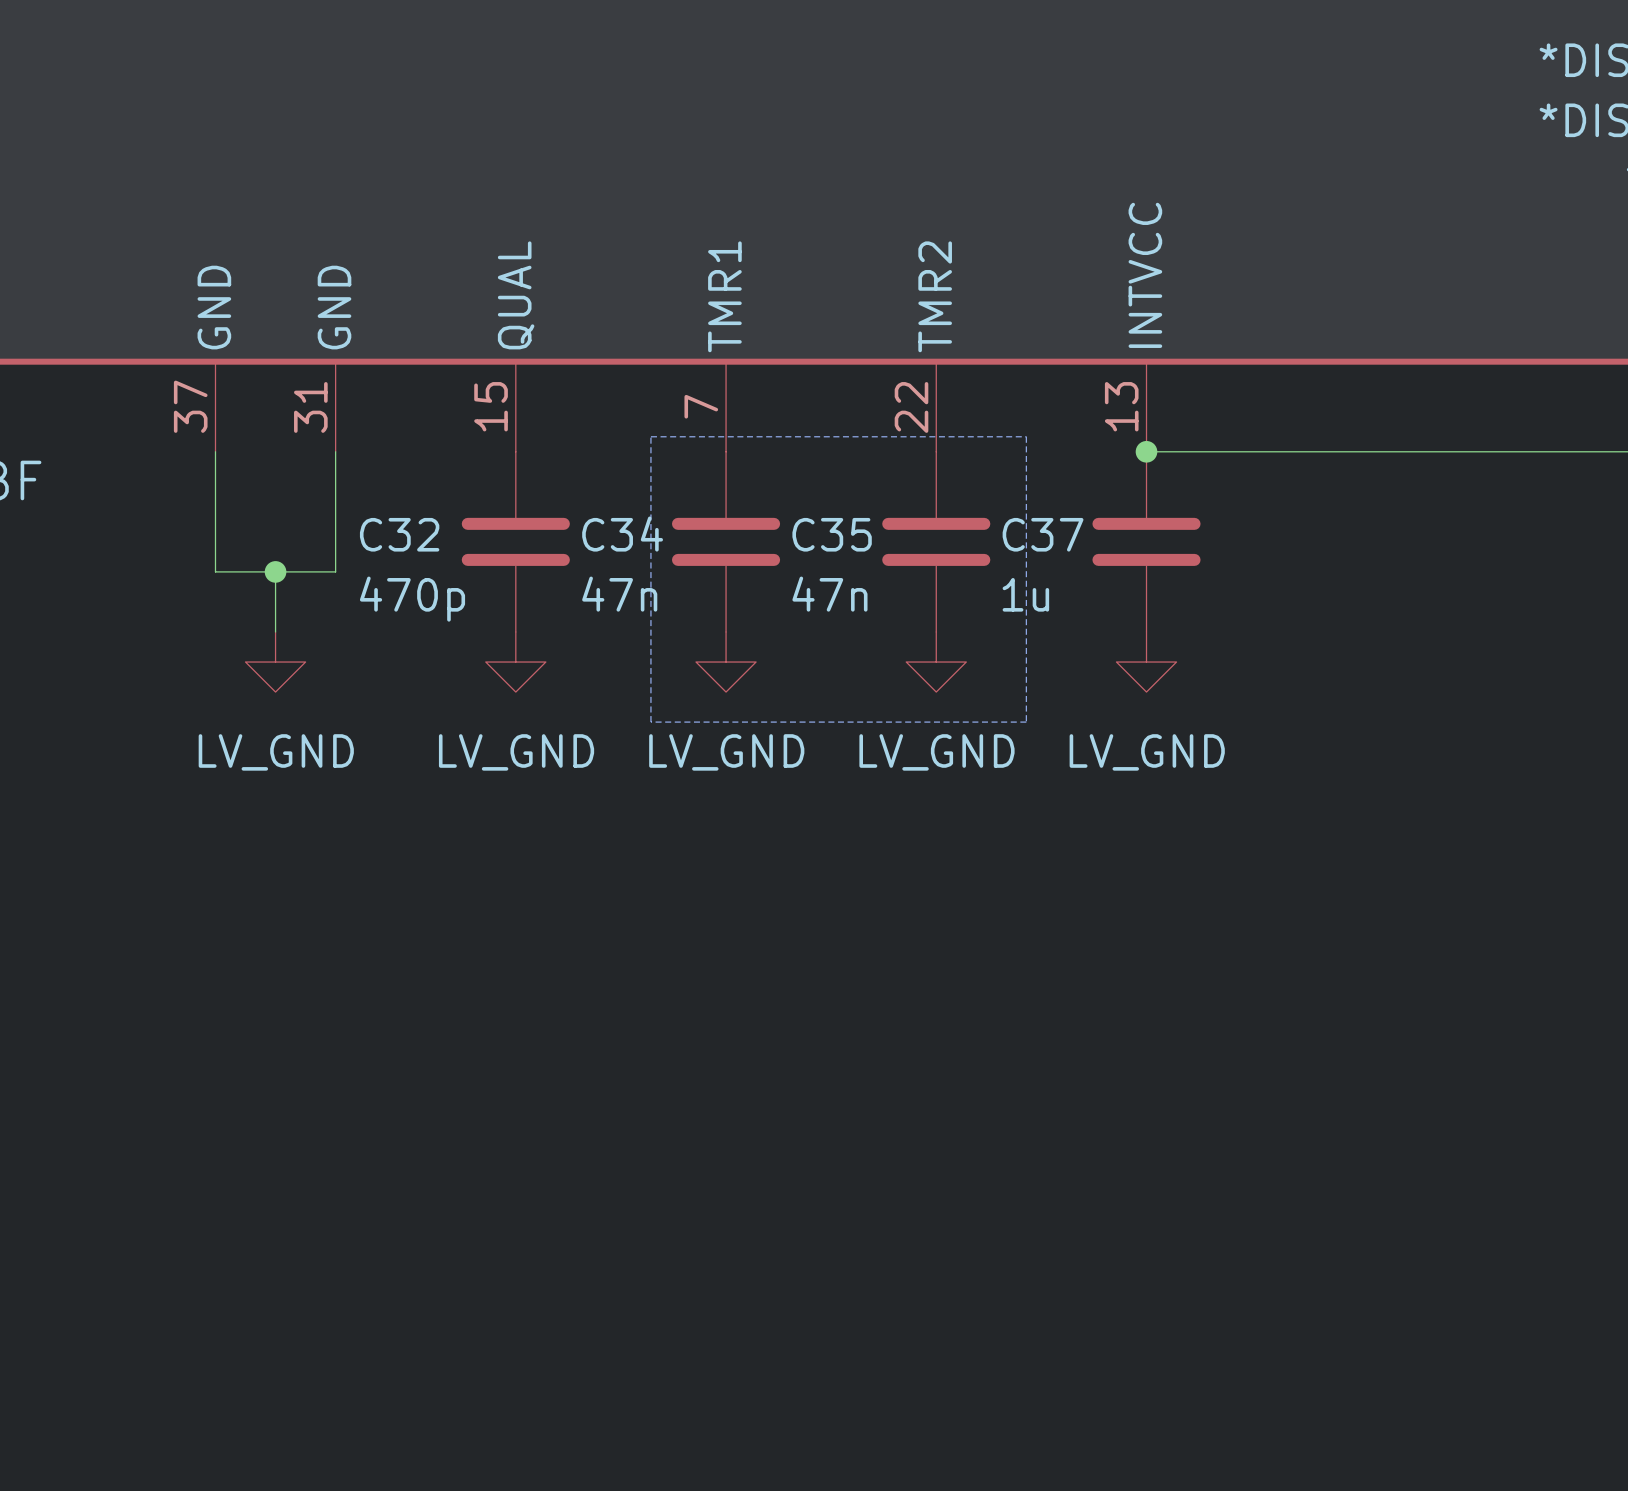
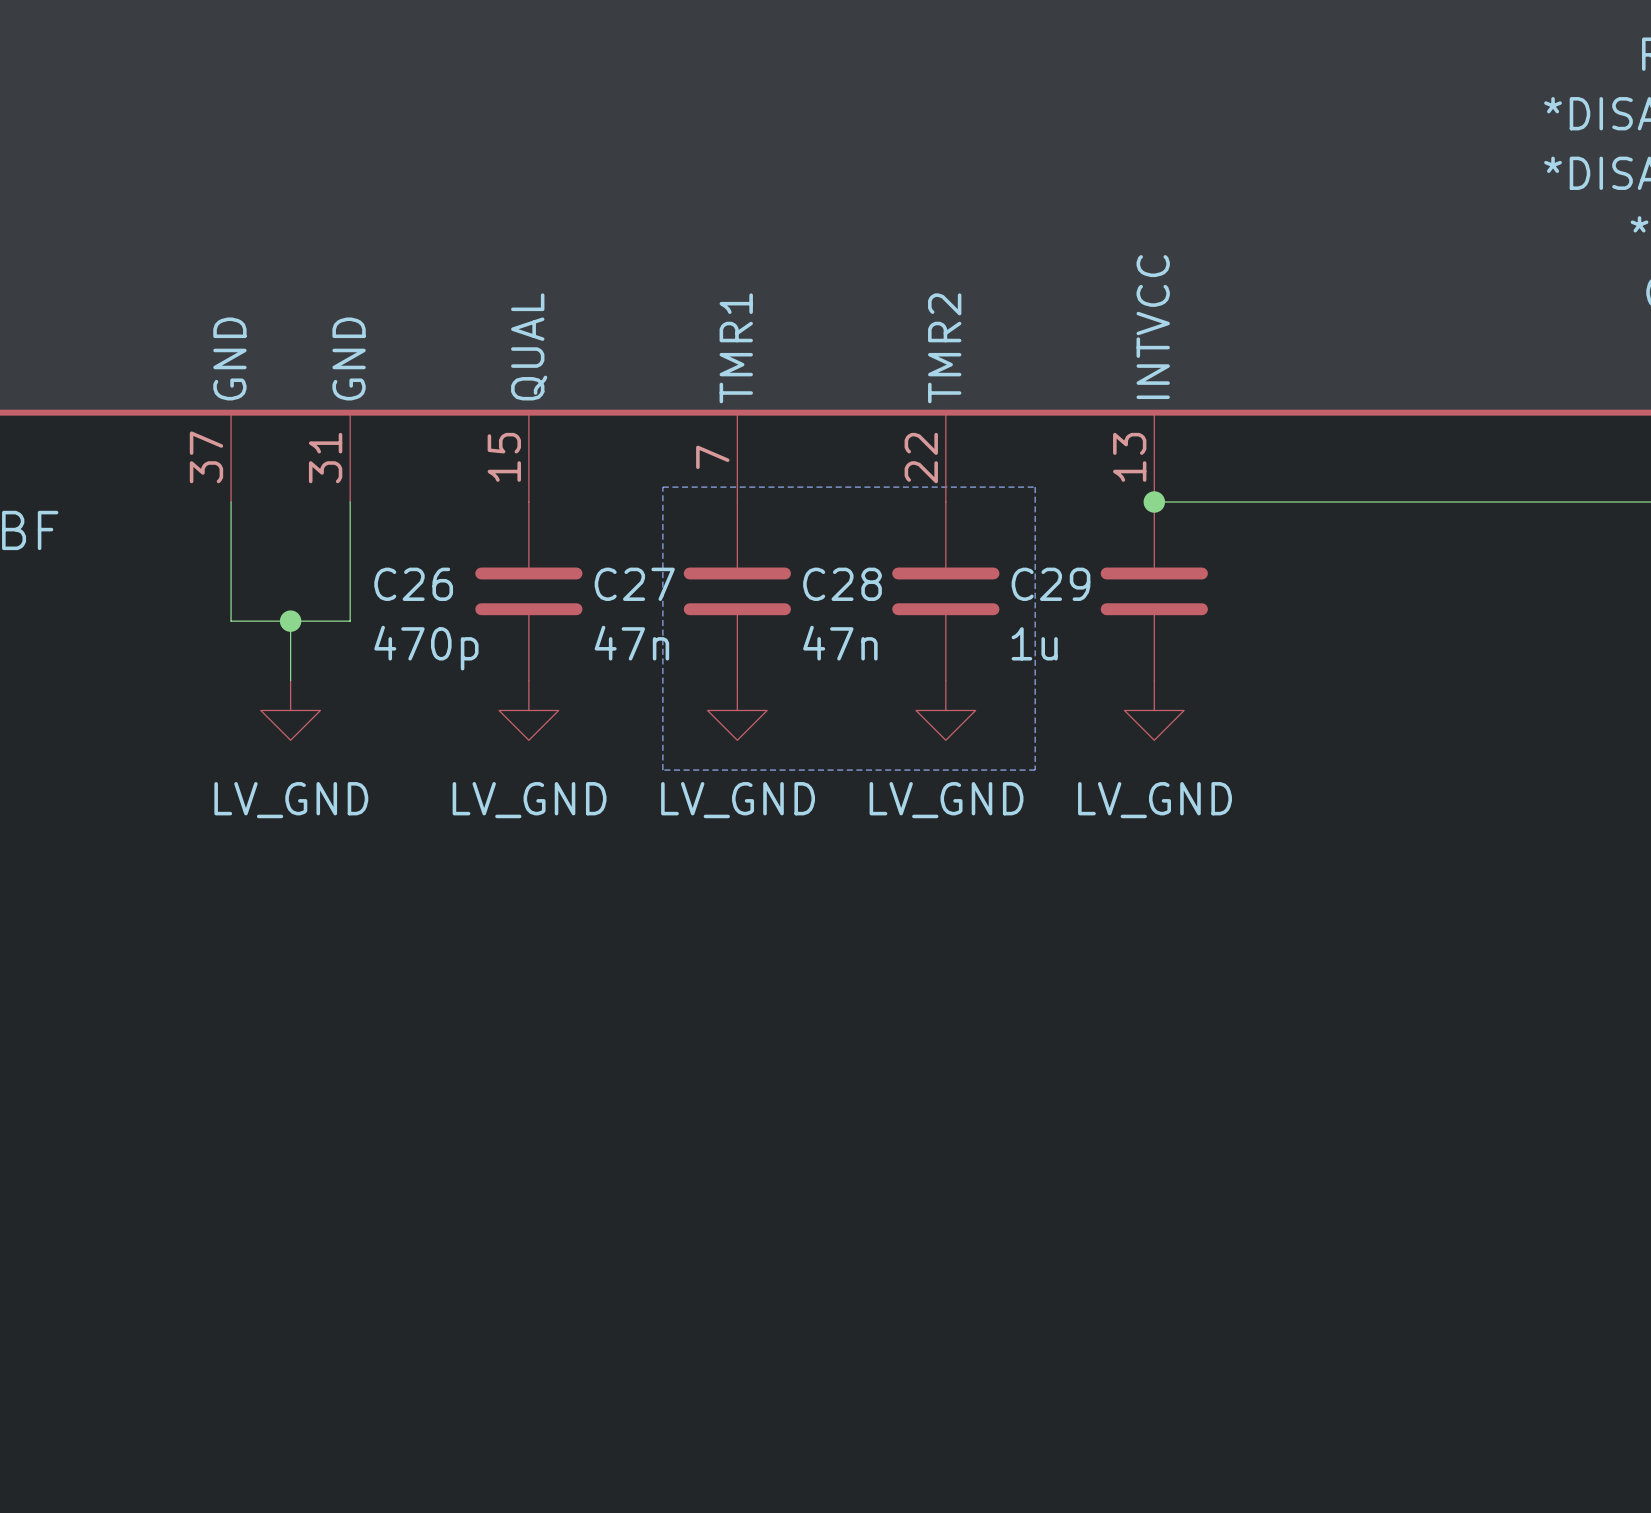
C32 name: C32 (399, 534) -> C26 (413, 584)
C34 name: C34 (622, 534) -> C27 (634, 584)
C35 name: C35 (832, 534) -> C28 (842, 584)
C37 name: C37 (1043, 534) -> C29 (1051, 584)

